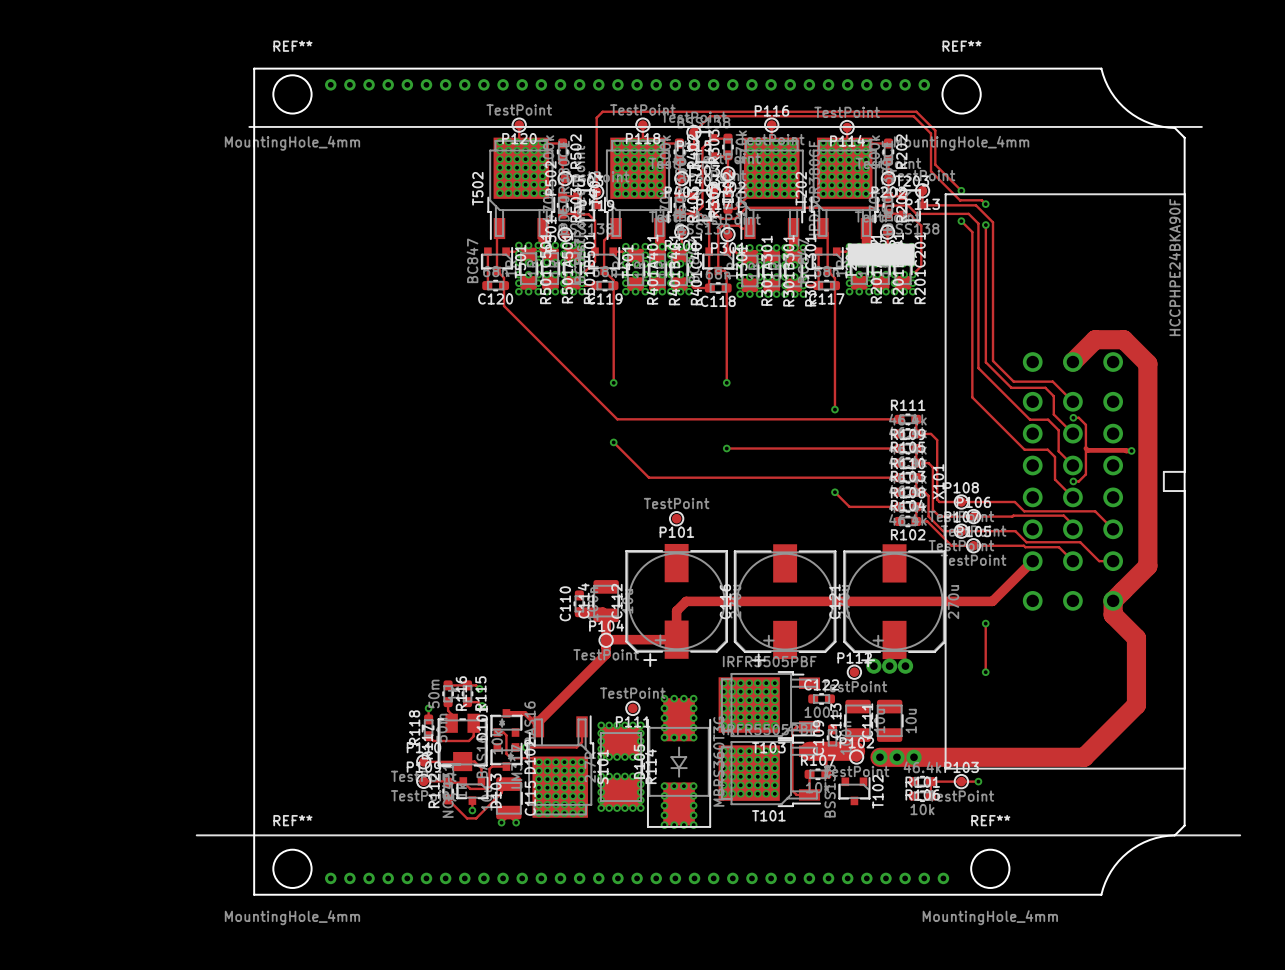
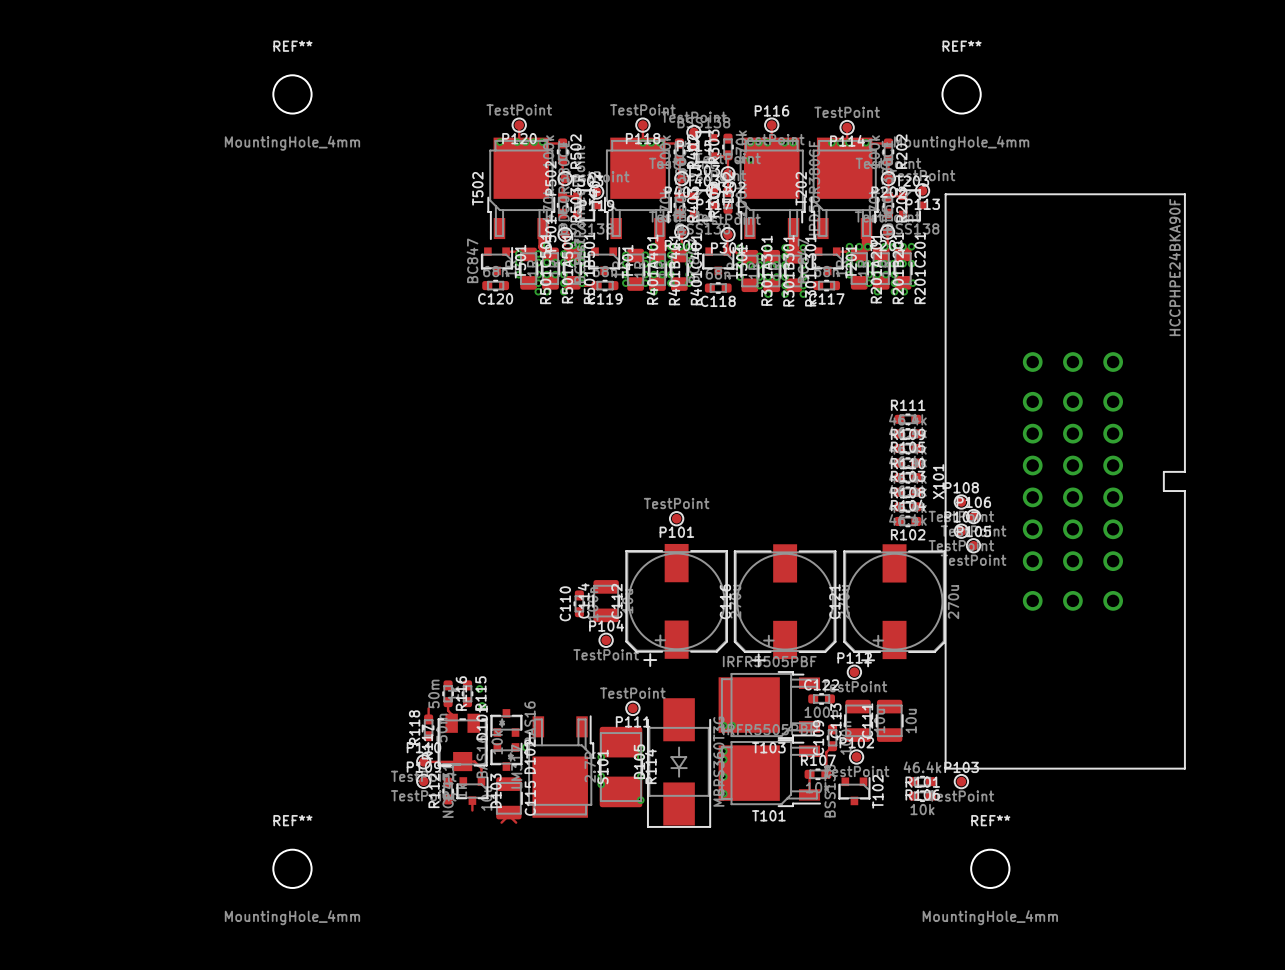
board edge: (254, 68) (1101, 68) (1111, 92) (1127, 110) (1149, 123) (1174, 127) (1184, 137) (1184, 825) (1174, 835) (1149, 839) (1127, 852) (1111, 871) (1101, 894) (254, 894) (254, 68) -> none
via: (330, 84) -> none
via: (349, 84) -> none
via: (369, 84) -> none
via: (388, 84) -> none
via: (407, 84) -> none
via: (426, 84) -> none
via: (445, 84) -> none
via: (464, 84) -> none
via: (483, 84) -> none
via: (503, 84) -> none
via: (522, 84) -> none
via: (541, 84) -> none
via: (560, 84) -> none
via: (579, 84) -> none
via: (598, 84) -> none
via: (617, 84) -> none
via: (637, 84) -> none
via: (656, 84) -> none
via: (675, 84) -> none
via: (694, 84) -> none
via: (713, 84) -> none
via: (732, 84) -> none
via: (751, 84) -> none
via: (771, 84) -> none
via: (790, 84) -> none
via: (809, 84) -> none
via: (828, 84) -> none
via: (847, 84) -> none
via: (866, 84) -> none
via: (885, 84) -> none
via: (905, 84) -> none
via: (924, 84) -> none
line: (249, 126) (1201, 126) -> none
track: (727, 138) (712, 137) (702, 148) (702, 206) (694, 214) -> none
via: (508, 142) -> none
via: (617, 142) -> none
via: (625, 142) -> none
via: (634, 142) -> none
via: (776, 142) -> none
via: (823, 142) -> none
via: (857, 142) -> none
track: (694, 147) (693, 132) (710, 116) (913, 116) (931, 133) (931, 171) (960, 200) (981, 200) (985, 204) -> none
via: (500, 150) -> none
via: (508, 150) -> none
via: (517, 150) -> none
via: (525, 150) -> none
via: (534, 150) -> none
via: (542, 150) -> none
via: (617, 151) -> none
via: (625, 151) -> none
via: (634, 151) -> none
via: (642, 151) -> none
via: (651, 151) -> none
via: (659, 151) -> none
via: (750, 151) -> none
via: (758, 151) -> none
via: (767, 151) -> none
via: (776, 151) -> none
via: (784, 151) -> none
via: (793, 151) -> none
via: (823, 151) -> none
via: (831, 151) -> none
via: (840, 151) -> none
via: (848, 151) -> none
via: (857, 151) -> none
via: (865, 151) -> none
via: (500, 159) -> none
via: (508, 159) -> none
via: (517, 159) -> none
via: (525, 159) -> none
via: (534, 159) -> none
via: (542, 159) -> none
via: (617, 159) -> none
via: (625, 159) -> none
via: (634, 159) -> none
via: (642, 159) -> none
via: (651, 159) -> none
via: (659, 159) -> none
via: (758, 159) -> none
via: (767, 159) -> none
via: (776, 159) -> none
via: (784, 159) -> none
via: (793, 159) -> none
via: (823, 159) -> none
via: (831, 159) -> none
via: (840, 159) -> none
via: (848, 159) -> none
via: (857, 159) -> none
via: (865, 159) -> none
via: (500, 167) -> none
via: (508, 167) -> none
via: (517, 167) -> none
via: (525, 167) -> none
via: (534, 167) -> none
via: (542, 167) -> none
via: (617, 168) -> none
via: (625, 168) -> none
via: (634, 168) -> none
via: (642, 168) -> none
via: (651, 168) -> none
via: (659, 168) -> none
via: (750, 168) -> none
via: (758, 168) -> none
via: (767, 168) -> none
via: (776, 168) -> none
via: (784, 168) -> none
via: (793, 168) -> none
via: (823, 168) -> none
via: (831, 168) -> none
via: (840, 168) -> none
via: (848, 168) -> none
via: (857, 168) -> none
via: (865, 168) -> none
via: (500, 176) -> none
via: (508, 176) -> none
via: (517, 176) -> none
via: (525, 176) -> none
via: (534, 176) -> none
via: (542, 176) -> none
via: (617, 176) -> none
via: (625, 176) -> none
via: (634, 176) -> none
via: (642, 176) -> none
via: (651, 176) -> none
via: (659, 176) -> none
via: (750, 176) -> none
via: (758, 176) -> none
via: (767, 176) -> none
via: (776, 176) -> none
via: (784, 176) -> none
via: (793, 176) -> none
via: (823, 176) -> none
via: (831, 176) -> none
via: (840, 176) -> none
via: (848, 176) -> none
via: (857, 176) -> none
via: (865, 176) -> none
via: (500, 184) -> none
via: (508, 184) -> none
via: (517, 184) -> none
via: (525, 184) -> none
via: (534, 184) -> none
via: (542, 184) -> none
via: (617, 185) -> none
via: (625, 185) -> none
via: (634, 185) -> none
via: (642, 185) -> none
via: (651, 185) -> none
via: (659, 185) -> none
via: (750, 185) -> none
via: (758, 185) -> none
via: (767, 185) -> none
via: (776, 185) -> none
via: (784, 185) -> none
via: (793, 185) -> none
via: (823, 185) -> none
via: (831, 185) -> none
via: (840, 185) -> none
via: (848, 185) -> none
via: (857, 185) -> none
via: (865, 185) -> none
track: (713, 190) (713, 211) (720, 218) (735, 218) (746, 207) (876, 207) (878, 205) (908, 205) (916, 213) (968, 213) (978, 223) (978, 368) (1030, 419) (1048, 419) (1058, 430) (1058, 451) (1072, 465) -> none
track: (922, 190) (922, 205) (975, 205) (993, 222) (993, 360) (1013, 381) (1052, 381) (1072, 401) -> none
track: (961, 190) (935, 164) (935, 130) (916, 111) (602, 111) (596, 117) (596, 205) -> none
via: (961, 190) -> none
via: (500, 193) -> none
via: (508, 193) -> none
via: (517, 193) -> none
via: (525, 193) -> none
via: (534, 193) -> none
via: (542, 193) -> none
via: (617, 193) -> none
via: (625, 193) -> none
via: (634, 193) -> none
via: (642, 193) -> none
via: (651, 193) -> none
via: (659, 193) -> none
track: (750, 193) (735, 208) (727, 208) -> none
via: (750, 193) -> none
via: (758, 193) -> none
via: (767, 193) -> none
via: (776, 193) -> none
via: (784, 193) -> none
via: (793, 193) -> none
via: (823, 193) -> none
via: (831, 193) -> none
via: (840, 193) -> none
via: (848, 193) -> none
via: (857, 193) -> none
via: (865, 193) -> none
via: (985, 204) -> none
track: (562, 213) (588, 214) (595, 220) (595, 261) (582, 274) -> none
track: (679, 213) (700, 214) (709, 222) (709, 288) (693, 288) (689, 283) -> none
track: (888, 213) (909, 214) (921, 225) (921, 266) (912, 274) -> none
track: (961, 221) (972, 232) (972, 397) (1024, 449) (1047, 449) (1055, 457) (1055, 479) (1072, 497) -> none
via: (961, 221) -> none
track: (985, 225) (985, 362) (1011, 387) (1045, 387) (1053, 396) (1053, 414) (1072, 433) -> none
via: (985, 225) -> none
track: (499, 228) (496, 231) (496, 270) (504, 277) (504, 306) (617, 419) (899, 419) -> none
track: (616, 228) (604, 240) (604, 270) (613, 280) (613, 285) -> none
track: (749, 228) (741, 228) (738, 225) (722, 225) (718, 229) (718, 270) (724, 270) (726, 273) (726, 288) (727, 286) -> none
track: (822, 228) (827, 233) (827, 270) (834, 278) (834, 409) -> none
drawing: [847, 243, 915, 266] -> none
via: (518, 245) -> none
via: (528, 245) -> none
via: (538, 245) -> none
via: (555, 245) -> none
via: (563, 245) -> none
via: (625, 246) -> none
via: (635, 246) -> none
via: (645, 246) -> none
via: (662, 246) -> none
via: (749, 247) -> none
via: (759, 247) -> none
via: (776, 247) -> none
via: (794, 247) -> none
track: (487, 251) (487, 285) -> none
track: (613, 251) (622, 251) (625, 255) -> none
track: (818, 251) (818, 285) (803, 285) -> none
via: (528, 262) -> none
via: (635, 263) -> none
via: (680, 263) -> none
via: (794, 264) -> none
via: (528, 274) -> none
via: (573, 274) -> none
via: (635, 274) -> none
via: (680, 274) -> none
via: (859, 274) -> none
via: (904, 274) -> none
via: (912, 274) -> none
via: (749, 277) -> none
via: (794, 277) -> none
via: (518, 283) -> none
via: (849, 283) -> none
track: (613, 285) (613, 382) -> none
via: (740, 285) -> none
track: (726, 288) (726, 382) -> none
via: (518, 291) -> none
via: (528, 291) -> none
via: (555, 291) -> none
via: (573, 291) -> none
via: (582, 291) -> none
via: (625, 291) -> none
via: (635, 291) -> none
via: (645, 291) -> none
via: (662, 291) -> none
via: (670, 291) -> none
via: (680, 291) -> none
via: (689, 291) -> none
via: (849, 291) -> none
via: (859, 291) -> none
via: (869, 291) -> none
via: (886, 291) -> none
via: (912, 291) -> none
via: (740, 294) -> none
via: (749, 294) -> none
via: (759, 294) -> none
via: (776, 294) -> none
via: (794, 294) -> none
track: (1072, 362) (1095, 339) (1123, 339) (1147, 363) (1147, 566) (1113, 600) (1113, 614) (1136, 638) (1136, 705) (1084, 757) (879, 757) -> none
via: (613, 382) -> none
via: (726, 382) -> none
via: (834, 409) -> none
track: (1073, 417) (1078, 417) (1085, 424) (1085, 474) (1078, 481) (1073, 481) -> none
via: (1073, 417) -> none
track: (916, 419) (916, 433) (931, 433) (937, 440) (937, 499) (939, 502) (1014, 502) (1024, 511) (1095, 511) (1113, 529) -> none
track: (613, 442) (648, 477) (899, 477) -> none
via: (613, 442) -> none
track: (726, 448) (899, 448) -> none
via: (726, 448) -> none
track: (916, 448) (916, 463) (928, 463) (932, 467) (932, 509) (939, 516) (1063, 515) (1072, 524) (1072, 529) -> none
track: (1085, 448) (1087, 450) (1131, 450) -> none
via: (1131, 450) -> none
track: (916, 477) (916, 492) (924, 492) (928, 495) (928, 516) (943, 531) (1015, 531) (1026, 542) (1080, 542) (1099, 561) (1113, 561) -> none
via: (1073, 481) -> none
track: (834, 492) (849, 506) (899, 506) -> none
via: (834, 492) -> none
track: (916, 506) (916, 521) (927, 521) (951, 545) (1058, 547) (1072, 561) -> none
track: (1032, 561) (992, 601) (686, 601) (676, 610) (676, 639) (606, 640) -> none
track: (579, 612) (602, 612) (606, 615) (606, 654) (538, 722) (538, 726) (524, 713) (506, 713) -> none
track: (985, 623) (985, 672) -> none
via: (985, 623) -> none
via: (873, 666) -> none
via: (889, 666) -> none
via: (905, 666) -> none
via: (985, 672) -> none
via: (723, 683) -> none
via: (732, 683) -> none
via: (740, 683) -> none
via: (749, 683) -> none
via: (757, 683) -> none
via: (766, 683) -> none
via: (774, 683) -> none
track: (448, 685) (476, 685) (479, 688) -> none
via: (723, 691) -> none
via: (732, 691) -> none
via: (740, 691) -> none
via: (749, 691) -> none
via: (757, 691) -> none
via: (766, 691) -> none
via: (774, 691) -> none
via: (664, 698) -> none
via: (674, 698) -> none
via: (683, 698) -> none
via: (693, 698) -> none
via: (723, 700) -> none
via: (732, 700) -> none
via: (740, 700) -> none
via: (749, 700) -> none
via: (757, 700) -> none
via: (766, 700) -> none
via: (774, 700) -> none
track: (467, 702) (478, 702) (482, 705) -> none
via: (428, 708) -> none
via: (664, 708) -> none
via: (693, 708) -> none
via: (723, 708) -> none
via: (732, 708) -> none
via: (740, 708) -> none
via: (749, 708) -> none
via: (757, 708) -> none
via: (766, 708) -> none
via: (774, 708) -> none
via: (723, 717) -> none
via: (732, 717) -> none
via: (740, 717) -> none
via: (749, 717) -> none
via: (757, 717) -> none
via: (766, 717) -> none
via: (774, 717) -> none
via: (664, 718) -> none
via: (693, 718) -> none
track: (473, 723) (473, 736) (468, 740) (433, 740) (428, 736) -> none
via: (601, 725) -> none
via: (609, 725) -> none
via: (617, 725) -> none
via: (624, 725) -> none
via: (632, 725) -> none
via: (640, 725) -> none
via: (740, 725) -> none
via: (749, 725) -> none
via: (757, 725) -> none
via: (766, 725) -> none
via: (774, 725) -> none
track: (582, 726) (582, 742) (576, 747) (515, 747) -> none
track: (809, 726) (796, 726) (792, 731) (792, 790) (796, 794) (809, 794) -> none
via: (664, 727) -> none
via: (693, 727) -> none
track: (497, 732) (503, 732) (506, 735) (506, 753) (510, 758) (534, 758) (538, 762) -> none
via: (601, 733) -> none
via: (640, 733) -> none
via: (664, 737) -> none
via: (674, 737) -> none
via: (683, 737) -> none
via: (693, 737) -> none
via: (601, 741) -> none
via: (640, 741) -> none
via: (601, 749) -> none
via: (732, 751) -> none
via: (740, 751) -> none
via: (749, 751) -> none
via: (757, 751) -> none
via: (766, 751) -> none
via: (774, 751) -> none
track: (809, 751) (855, 751) -> none
via: (609, 757) -> none
via: (617, 757) -> none
via: (624, 757) -> none
via: (632, 757) -> none
via: (879, 757) -> none
via: (896, 757) -> none
via: (913, 757) -> none
via: (732, 759) -> none
via: (740, 759) -> none
via: (749, 759) -> none
via: (757, 759) -> none
via: (766, 759) -> none
via: (774, 759) -> none
via: (538, 762) -> none
via: (547, 762) -> none
via: (555, 762) -> none
via: (564, 762) -> none
via: (572, 762) -> none
via: (581, 762) -> none
track: (506, 766) (491, 766) (489, 769) (487, 788) (470, 788) (463, 781) (423, 781) -> none
via: (723, 768) -> none
via: (732, 768) -> none
via: (740, 768) -> none
via: (749, 768) -> none
via: (757, 768) -> none
via: (766, 768) -> none
via: (774, 768) -> none
via: (538, 770) -> none
via: (547, 770) -> none
via: (555, 770) -> none
via: (564, 770) -> none
via: (572, 770) -> none
via: (581, 770) -> none
via: (609, 776) -> none
via: (617, 776) -> none
via: (624, 776) -> none
via: (632, 776) -> none
via: (732, 776) -> none
via: (740, 776) -> none
via: (749, 776) -> none
via: (757, 776) -> none
via: (766, 776) -> none
via: (774, 776) -> none
via: (538, 779) -> none
via: (547, 779) -> none
via: (555, 779) -> none
via: (564, 779) -> none
via: (572, 779) -> none
via: (581, 779) -> none
track: (978, 781) (930, 781) (930, 796) -> none
via: (978, 781) -> none
track: (508, 784) (476, 818) (467, 818) (448, 799) -> none
via: (640, 784) -> none
via: (723, 785) -> none
via: (732, 785) -> none
via: (740, 785) -> none
via: (749, 785) -> none
via: (757, 785) -> none
via: (766, 785) -> none
via: (774, 785) -> none
via: (664, 786) -> none
via: (674, 786) -> none
via: (683, 786) -> none
via: (693, 786) -> none
via: (538, 787) -> none
via: (547, 787) -> none
via: (555, 787) -> none
via: (564, 787) -> none
via: (572, 787) -> none
via: (581, 787) -> none
via: (601, 792) -> none
via: (640, 792) -> none
via: (732, 793) -> none
via: (740, 793) -> none
via: (749, 793) -> none
via: (757, 793) -> none
via: (766, 793) -> none
via: (774, 793) -> none
via: (664, 795) -> none
via: (693, 795) -> none
via: (538, 796) -> none
via: (547, 796) -> none
via: (555, 796) -> none
via: (564, 796) -> none
via: (572, 796) -> none
via: (581, 796) -> none
via: (601, 800) -> none
via: (538, 804) -> none
via: (547, 804) -> none
via: (555, 804) -> none
via: (564, 804) -> none
via: (572, 804) -> none
via: (581, 804) -> none
via: (664, 805) -> none
via: (693, 805) -> none
via: (601, 808) -> none
via: (609, 808) -> none
via: (617, 808) -> none
via: (624, 808) -> none
via: (632, 808) -> none
via: (640, 808) -> none
via: (472, 810) -> none
via: (538, 813) -> none
via: (547, 813) -> none
via: (555, 813) -> none
via: (564, 813) -> none
via: (572, 813) -> none
via: (581, 813) -> none
via: (664, 815) -> none
via: (693, 815) -> none
via: (501, 822) -> none
via: (516, 822) -> none
via: (664, 825) -> none
via: (674, 825) -> none
via: (683, 825) -> none
via: (693, 825) -> none
line: (196, 835) (1240, 835) -> none
via: (330, 878) -> none
via: (349, 878) -> none
via: (369, 878) -> none
via: (388, 878) -> none
via: (407, 878) -> none
via: (426, 878) -> none
via: (445, 878) -> none
via: (464, 878) -> none
via: (483, 878) -> none
via: (503, 878) -> none
via: (522, 878) -> none
via: (541, 878) -> none
via: (560, 878) -> none
via: (579, 878) -> none
via: (598, 878) -> none
via: (617, 878) -> none
via: (637, 878) -> none
via: (656, 878) -> none
via: (675, 878) -> none
via: (694, 878) -> none
via: (713, 878) -> none
via: (732, 878) -> none
via: (751, 878) -> none
via: (771, 878) -> none
via: (790, 878) -> none
via: (809, 878) -> none
via: (828, 878) -> none
via: (847, 878) -> none
via: (866, 878) -> none
via: (885, 878) -> none
via: (905, 878) -> none
via: (924, 878) -> none
via: (943, 878) -> none

